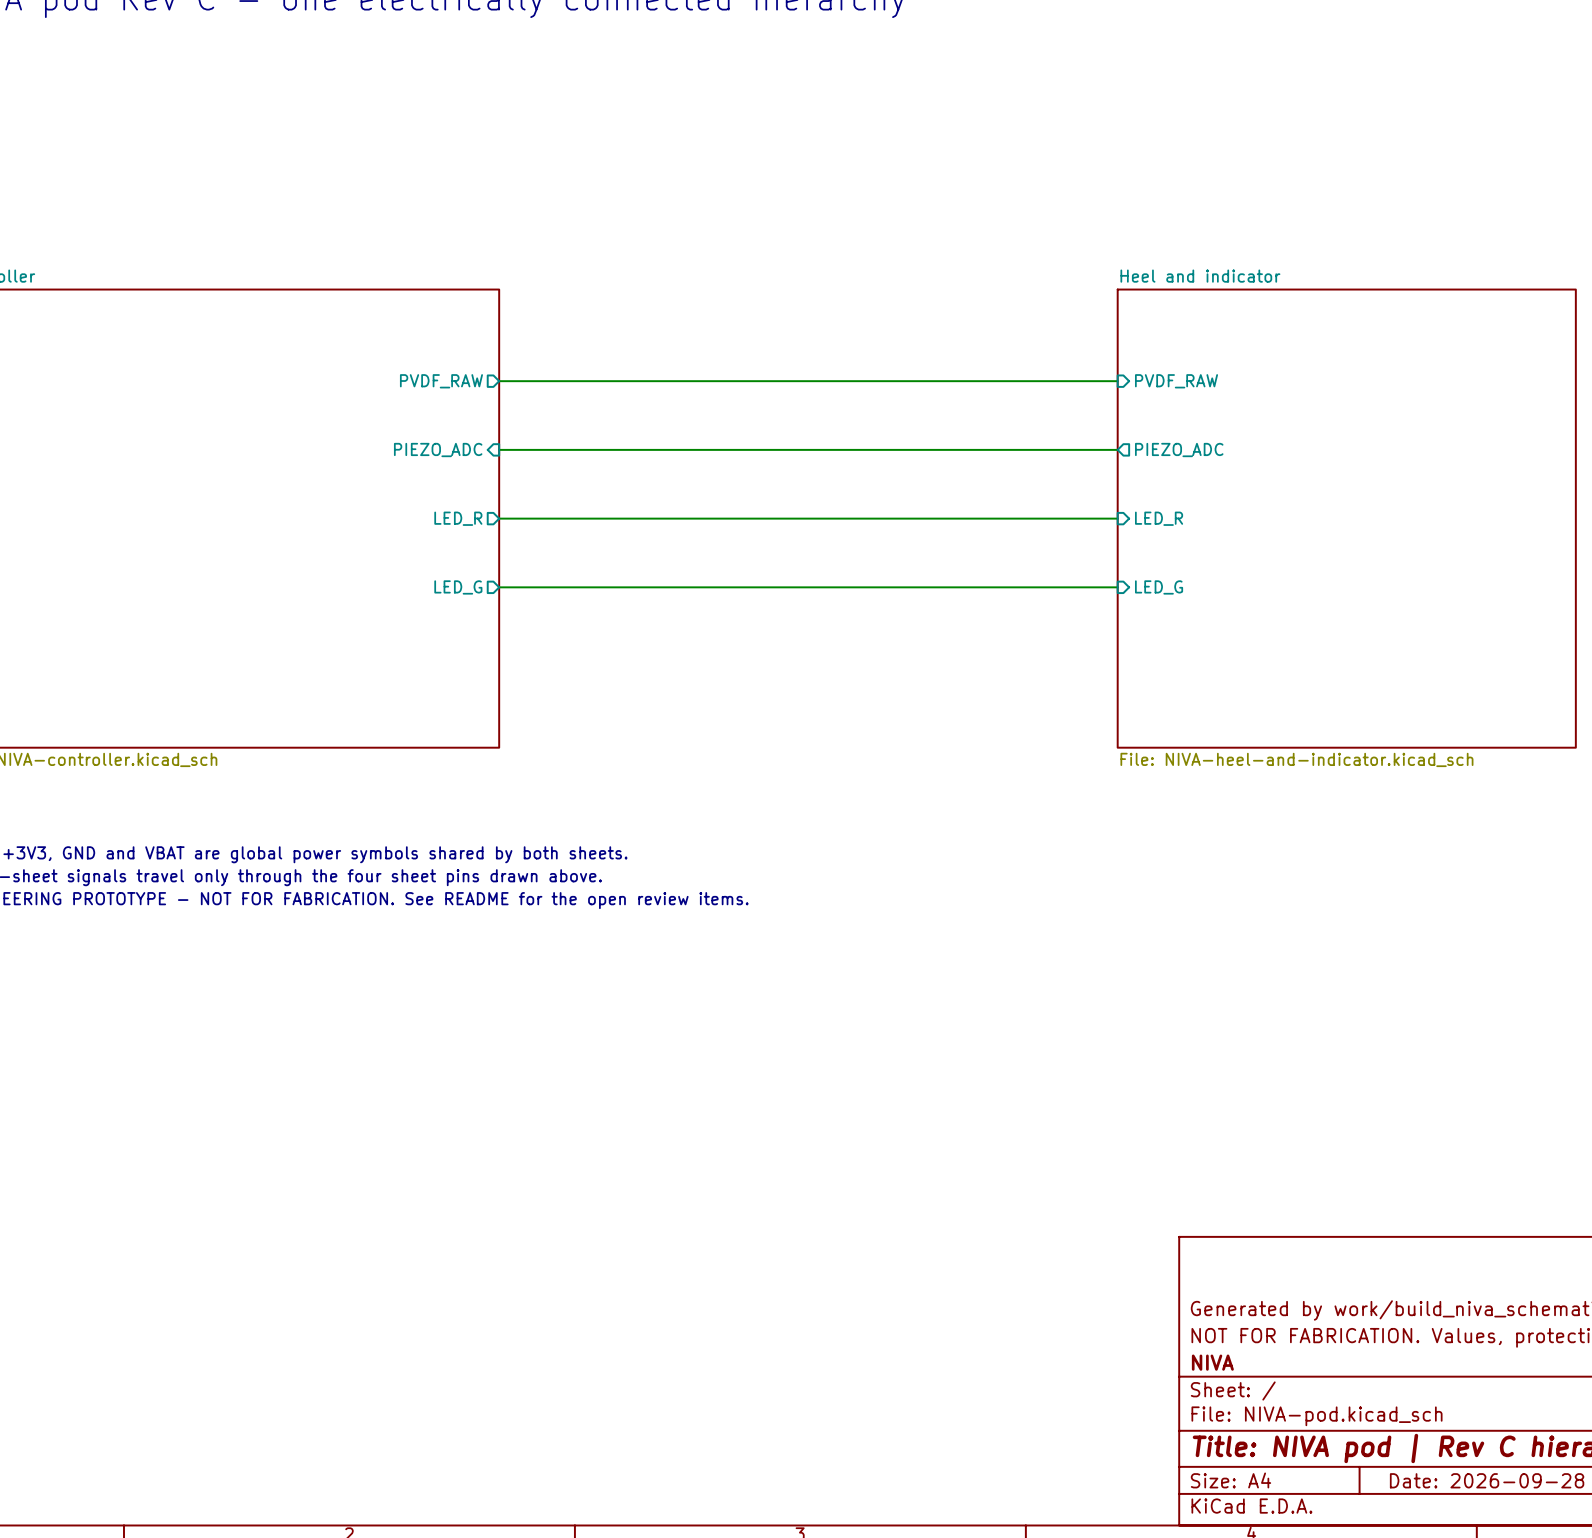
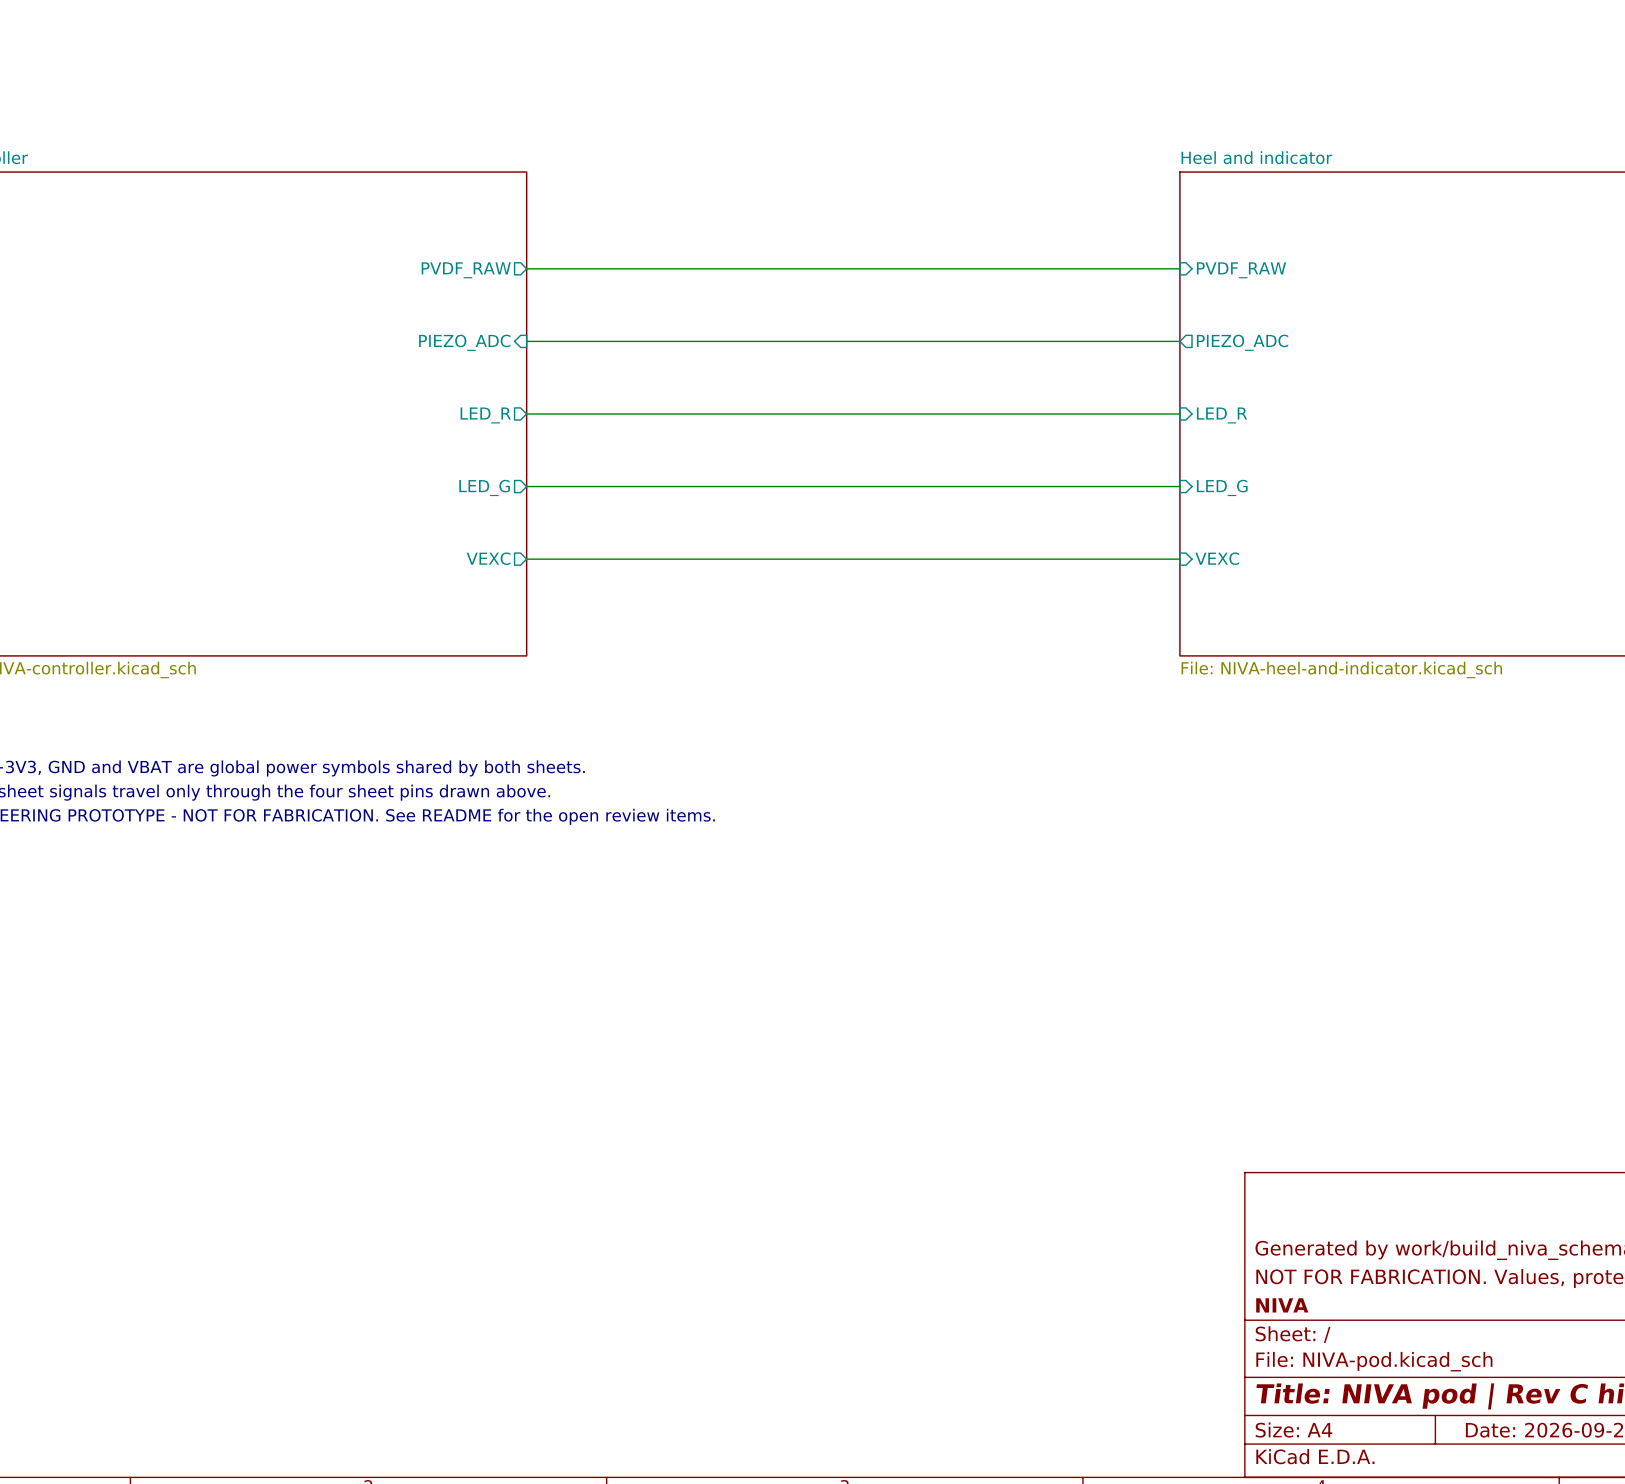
sheet pin: none -> VEXC (488, 558)
sheet pin: none -> VEXC (1217, 558)
wire: none -> (526, 559) (1179, 559)

